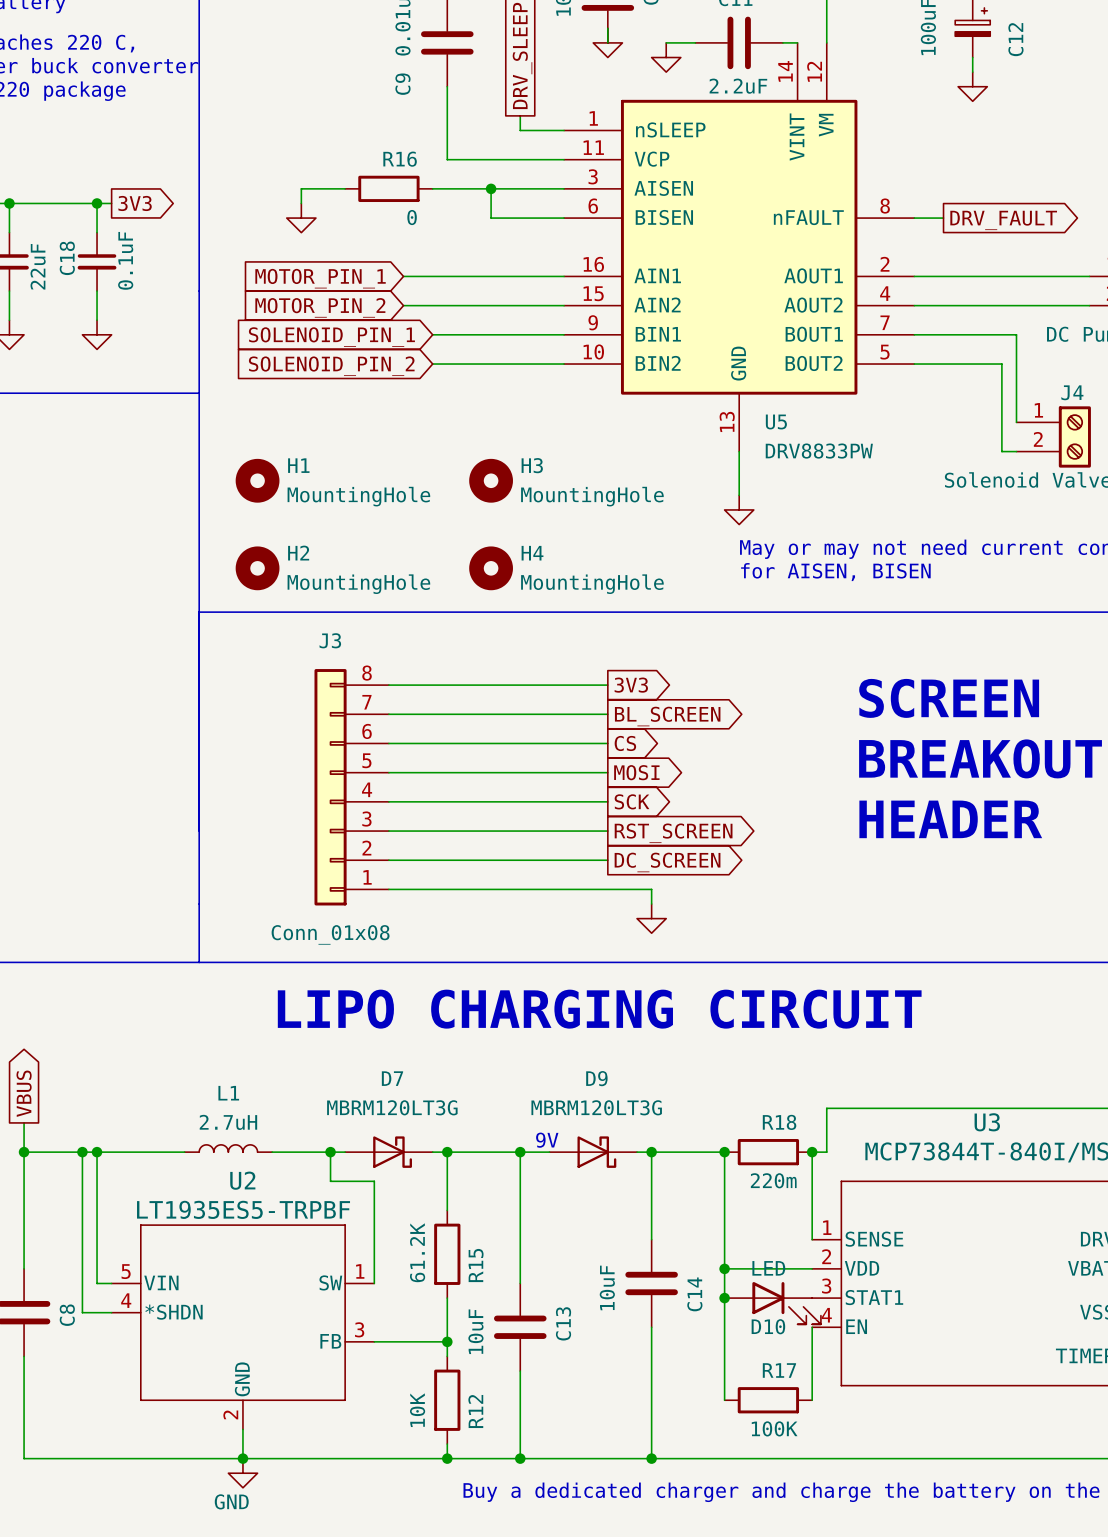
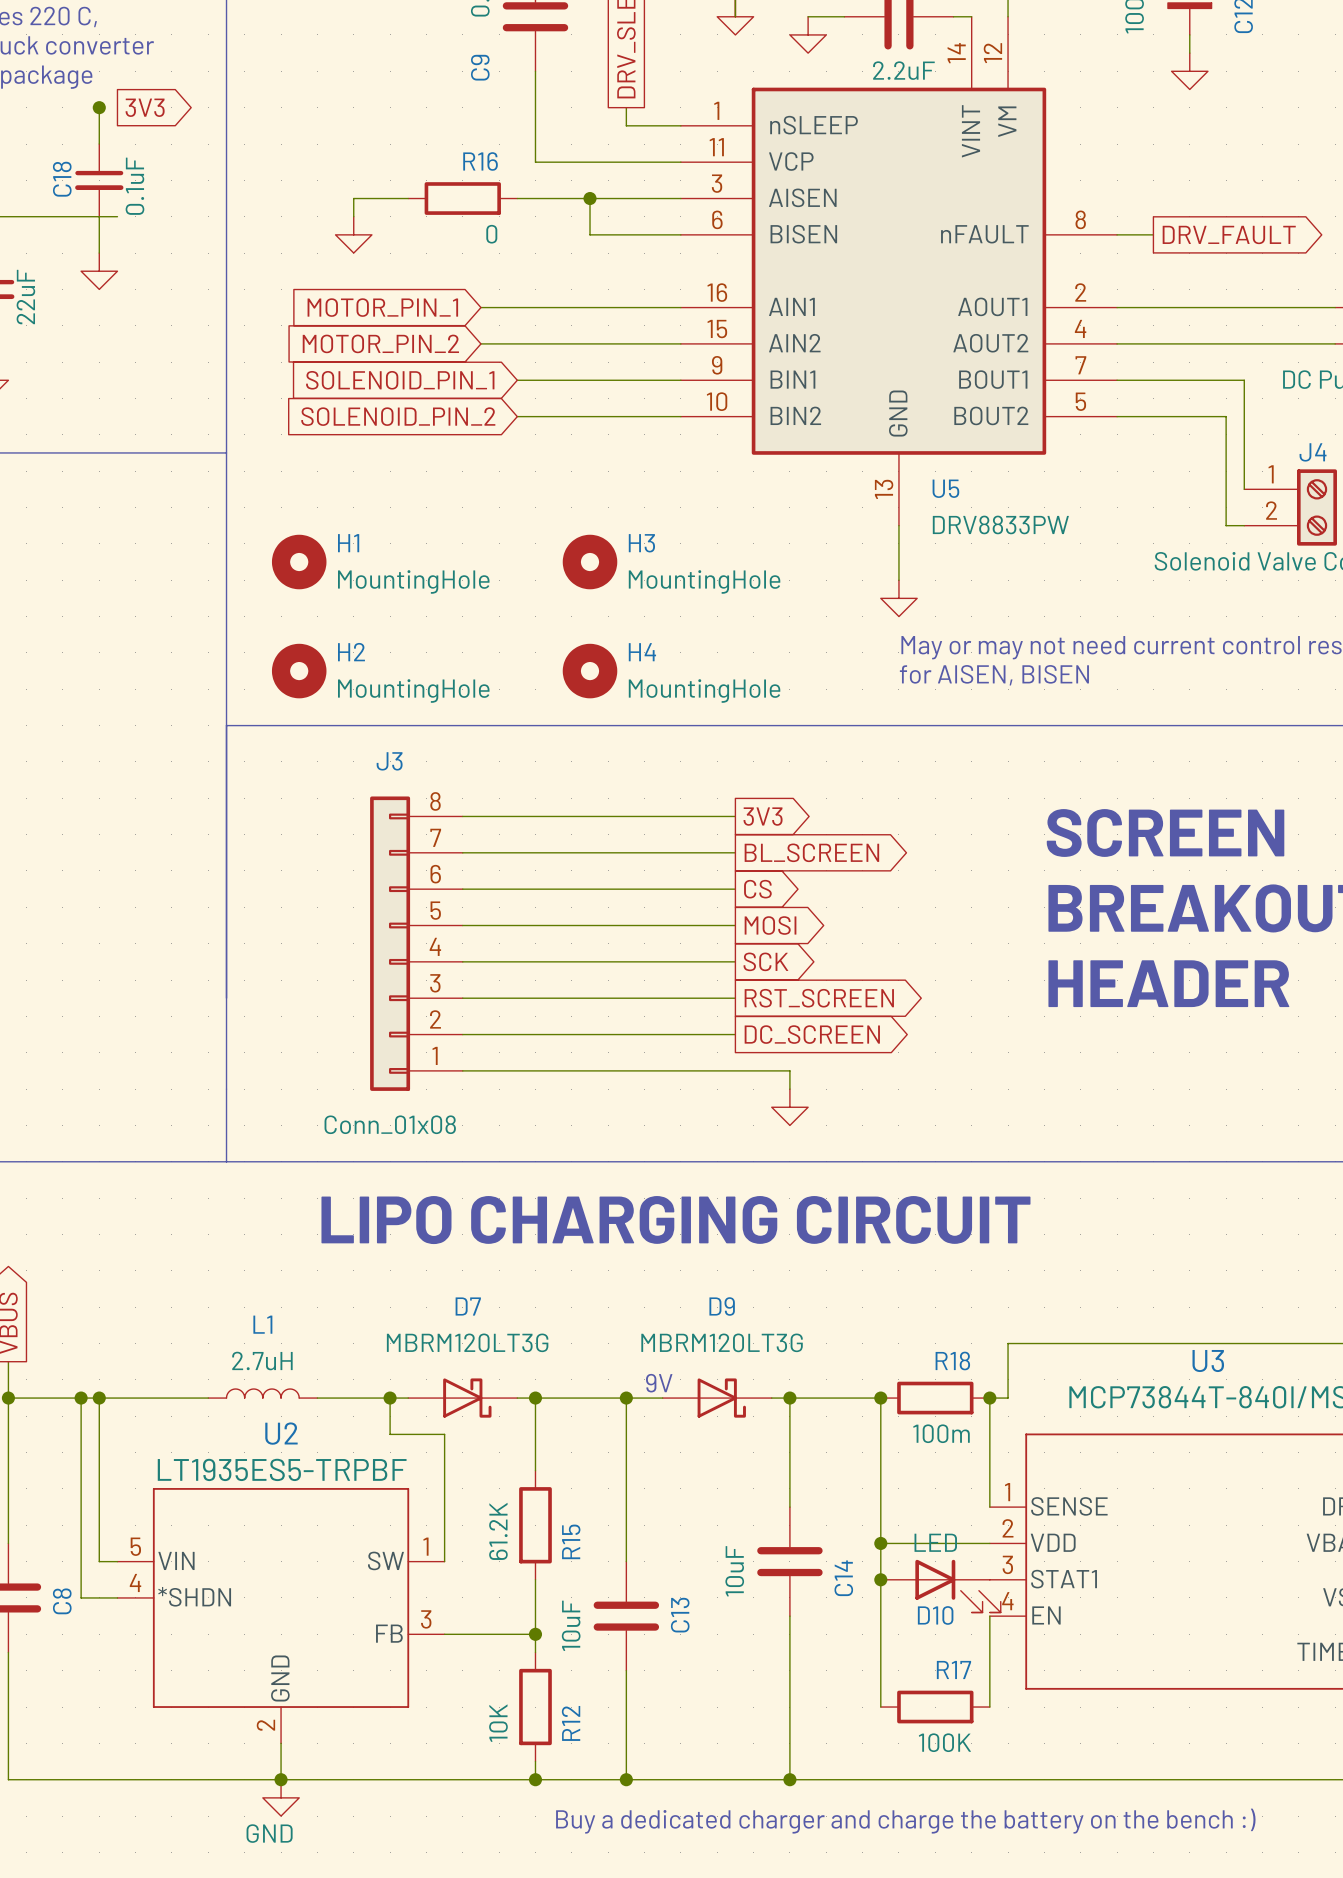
junction: none -> (99, 107)
junction: (97, 203) -> none
global label position: 3V3 (135, 203) -> 3V3 (145, 107)
C18 position: (97, 261) -> (99, 180)
wire: (97, 291) (97, 320) -> (99, 107) (99, 144)
power symbol position: (97, 334) -> (99, 271)
R18 value: 220m (773, 1180) -> 100m (941, 1433)

